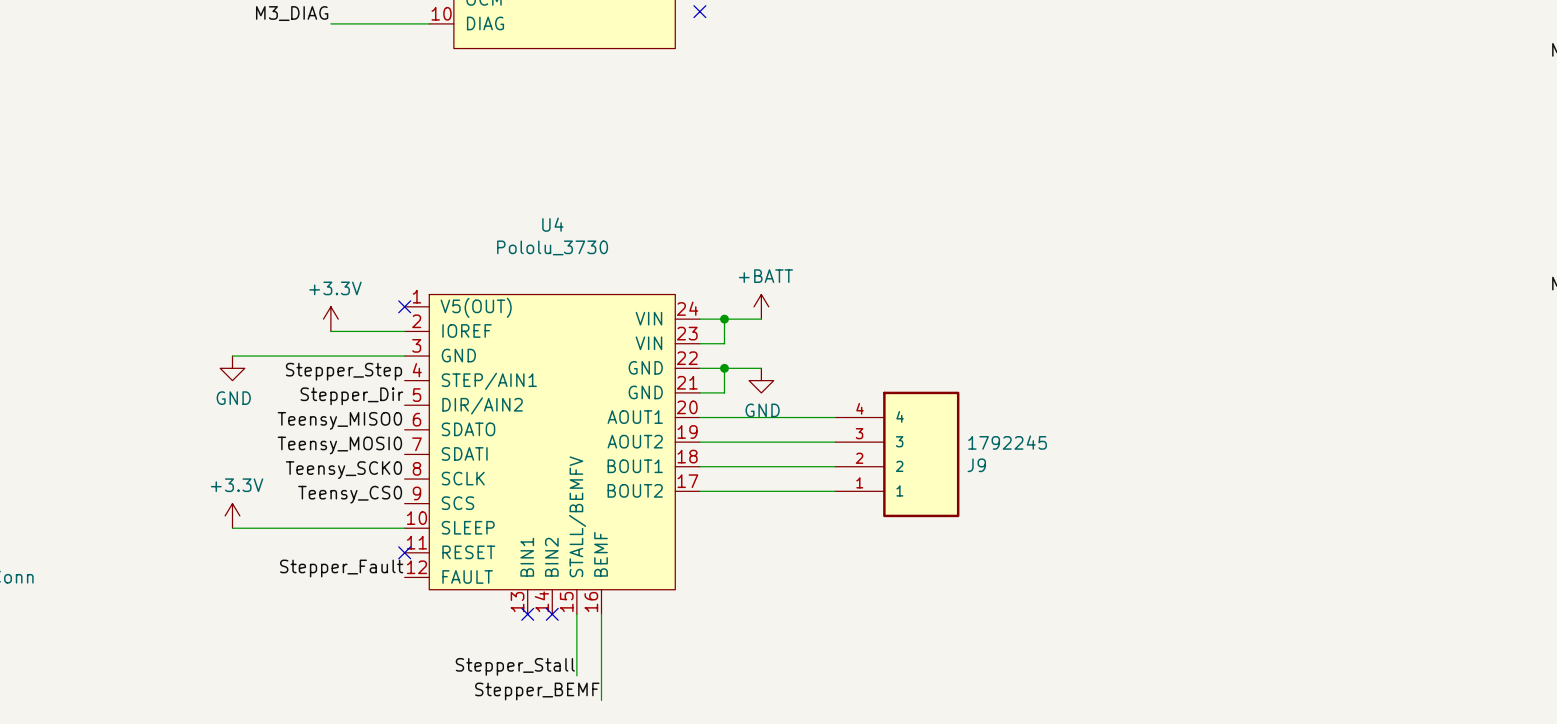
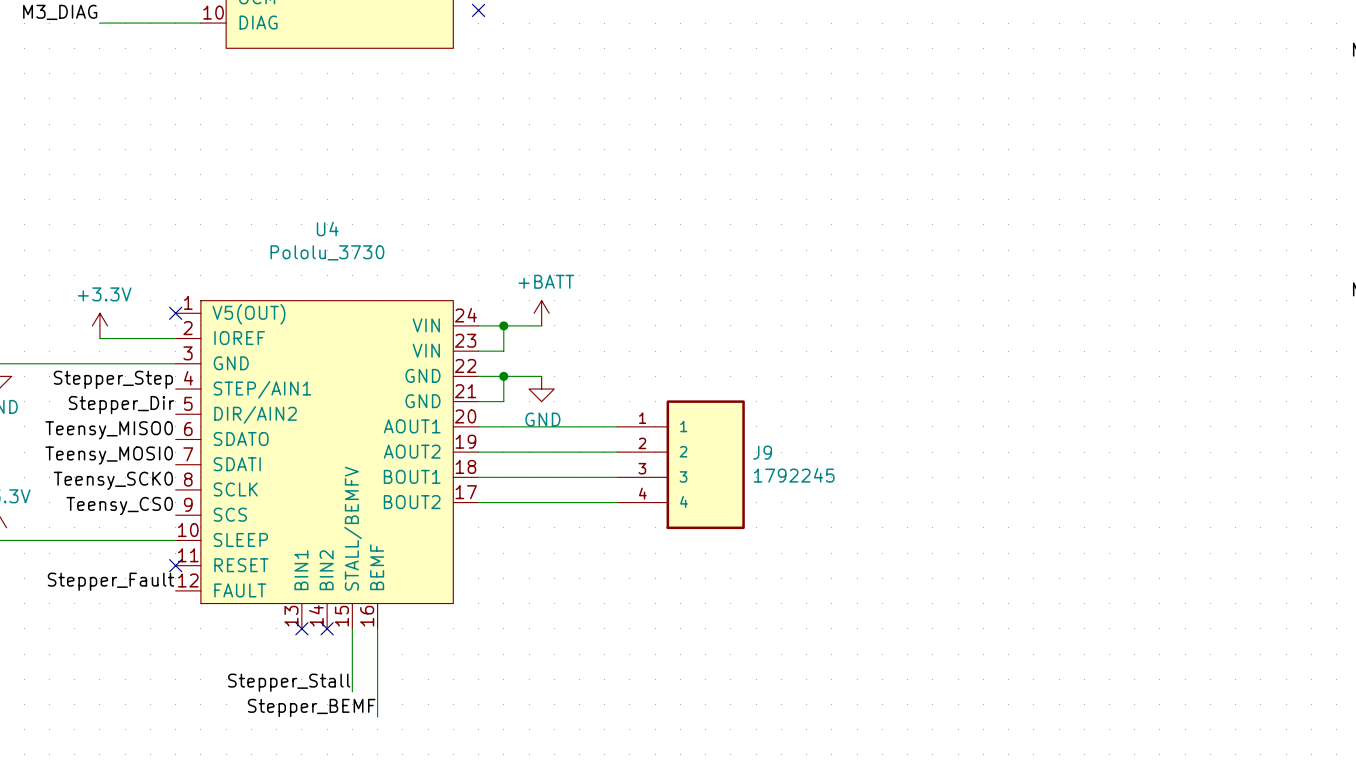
J9 flip: as is (921, 454) -> up-down (705, 464)

